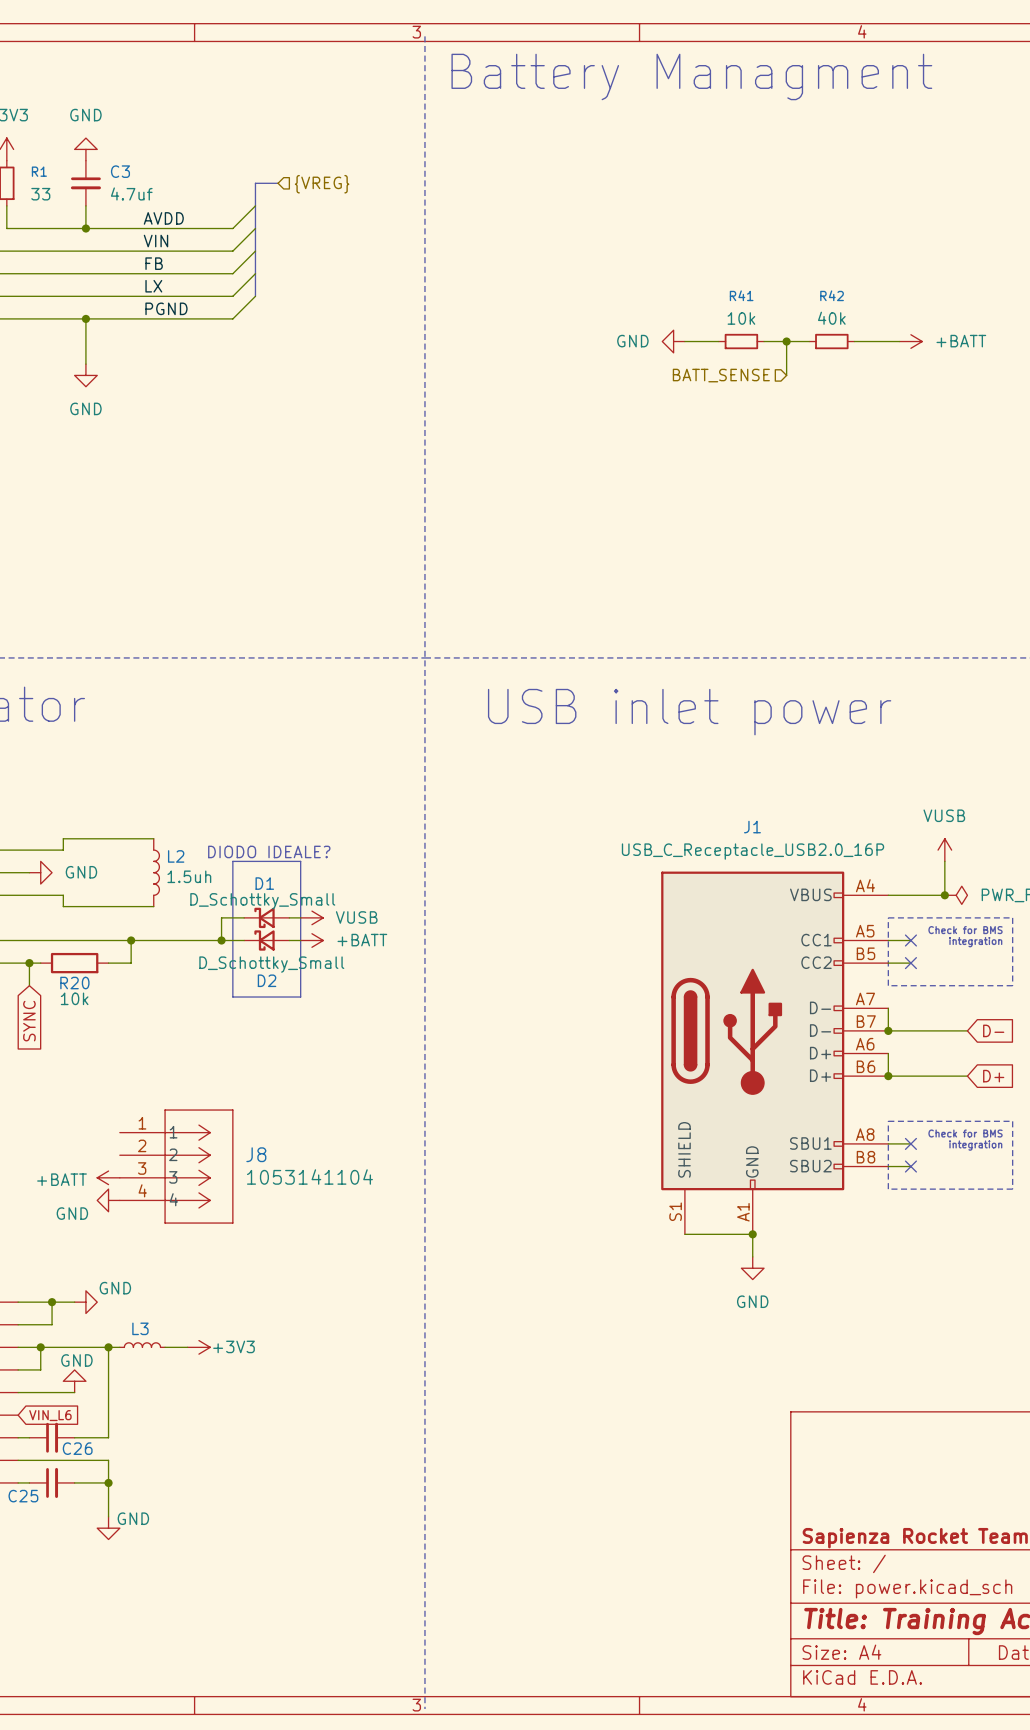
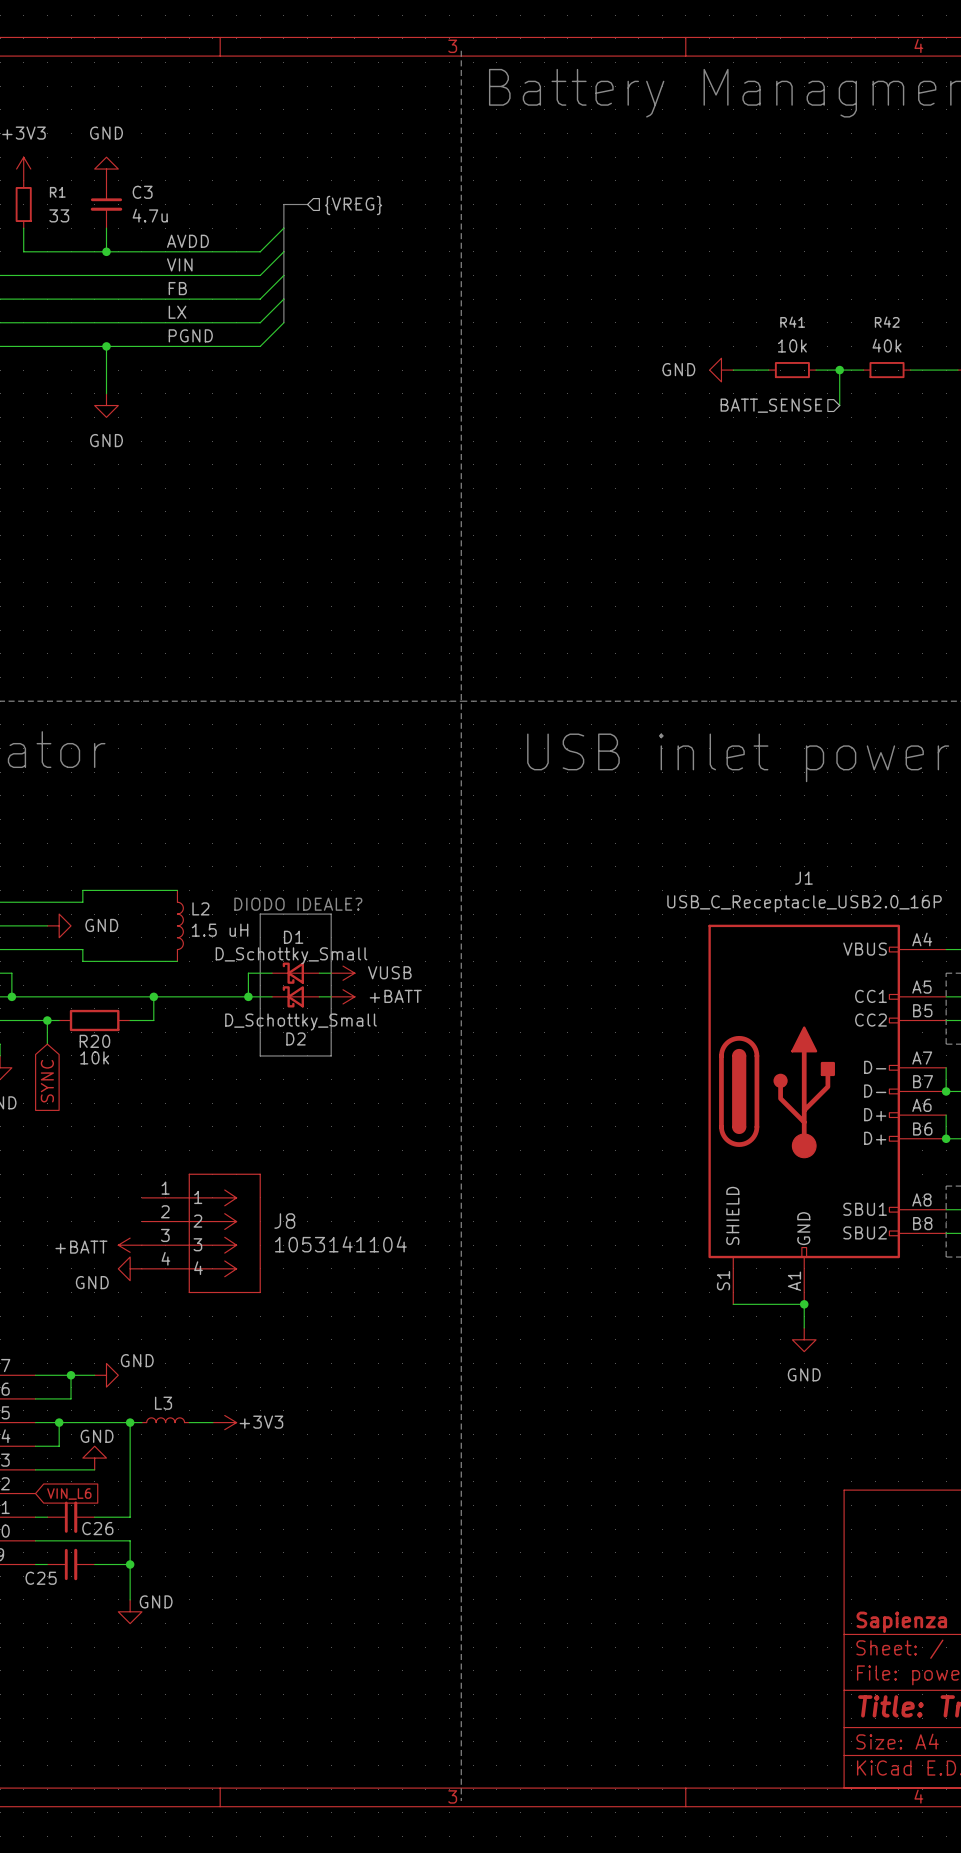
C3 value: 4.7uf (131, 193) -> 4.7u (150, 215)
L2 value: 1.5uh (189, 876) -> 1.5 uH (220, 930)

